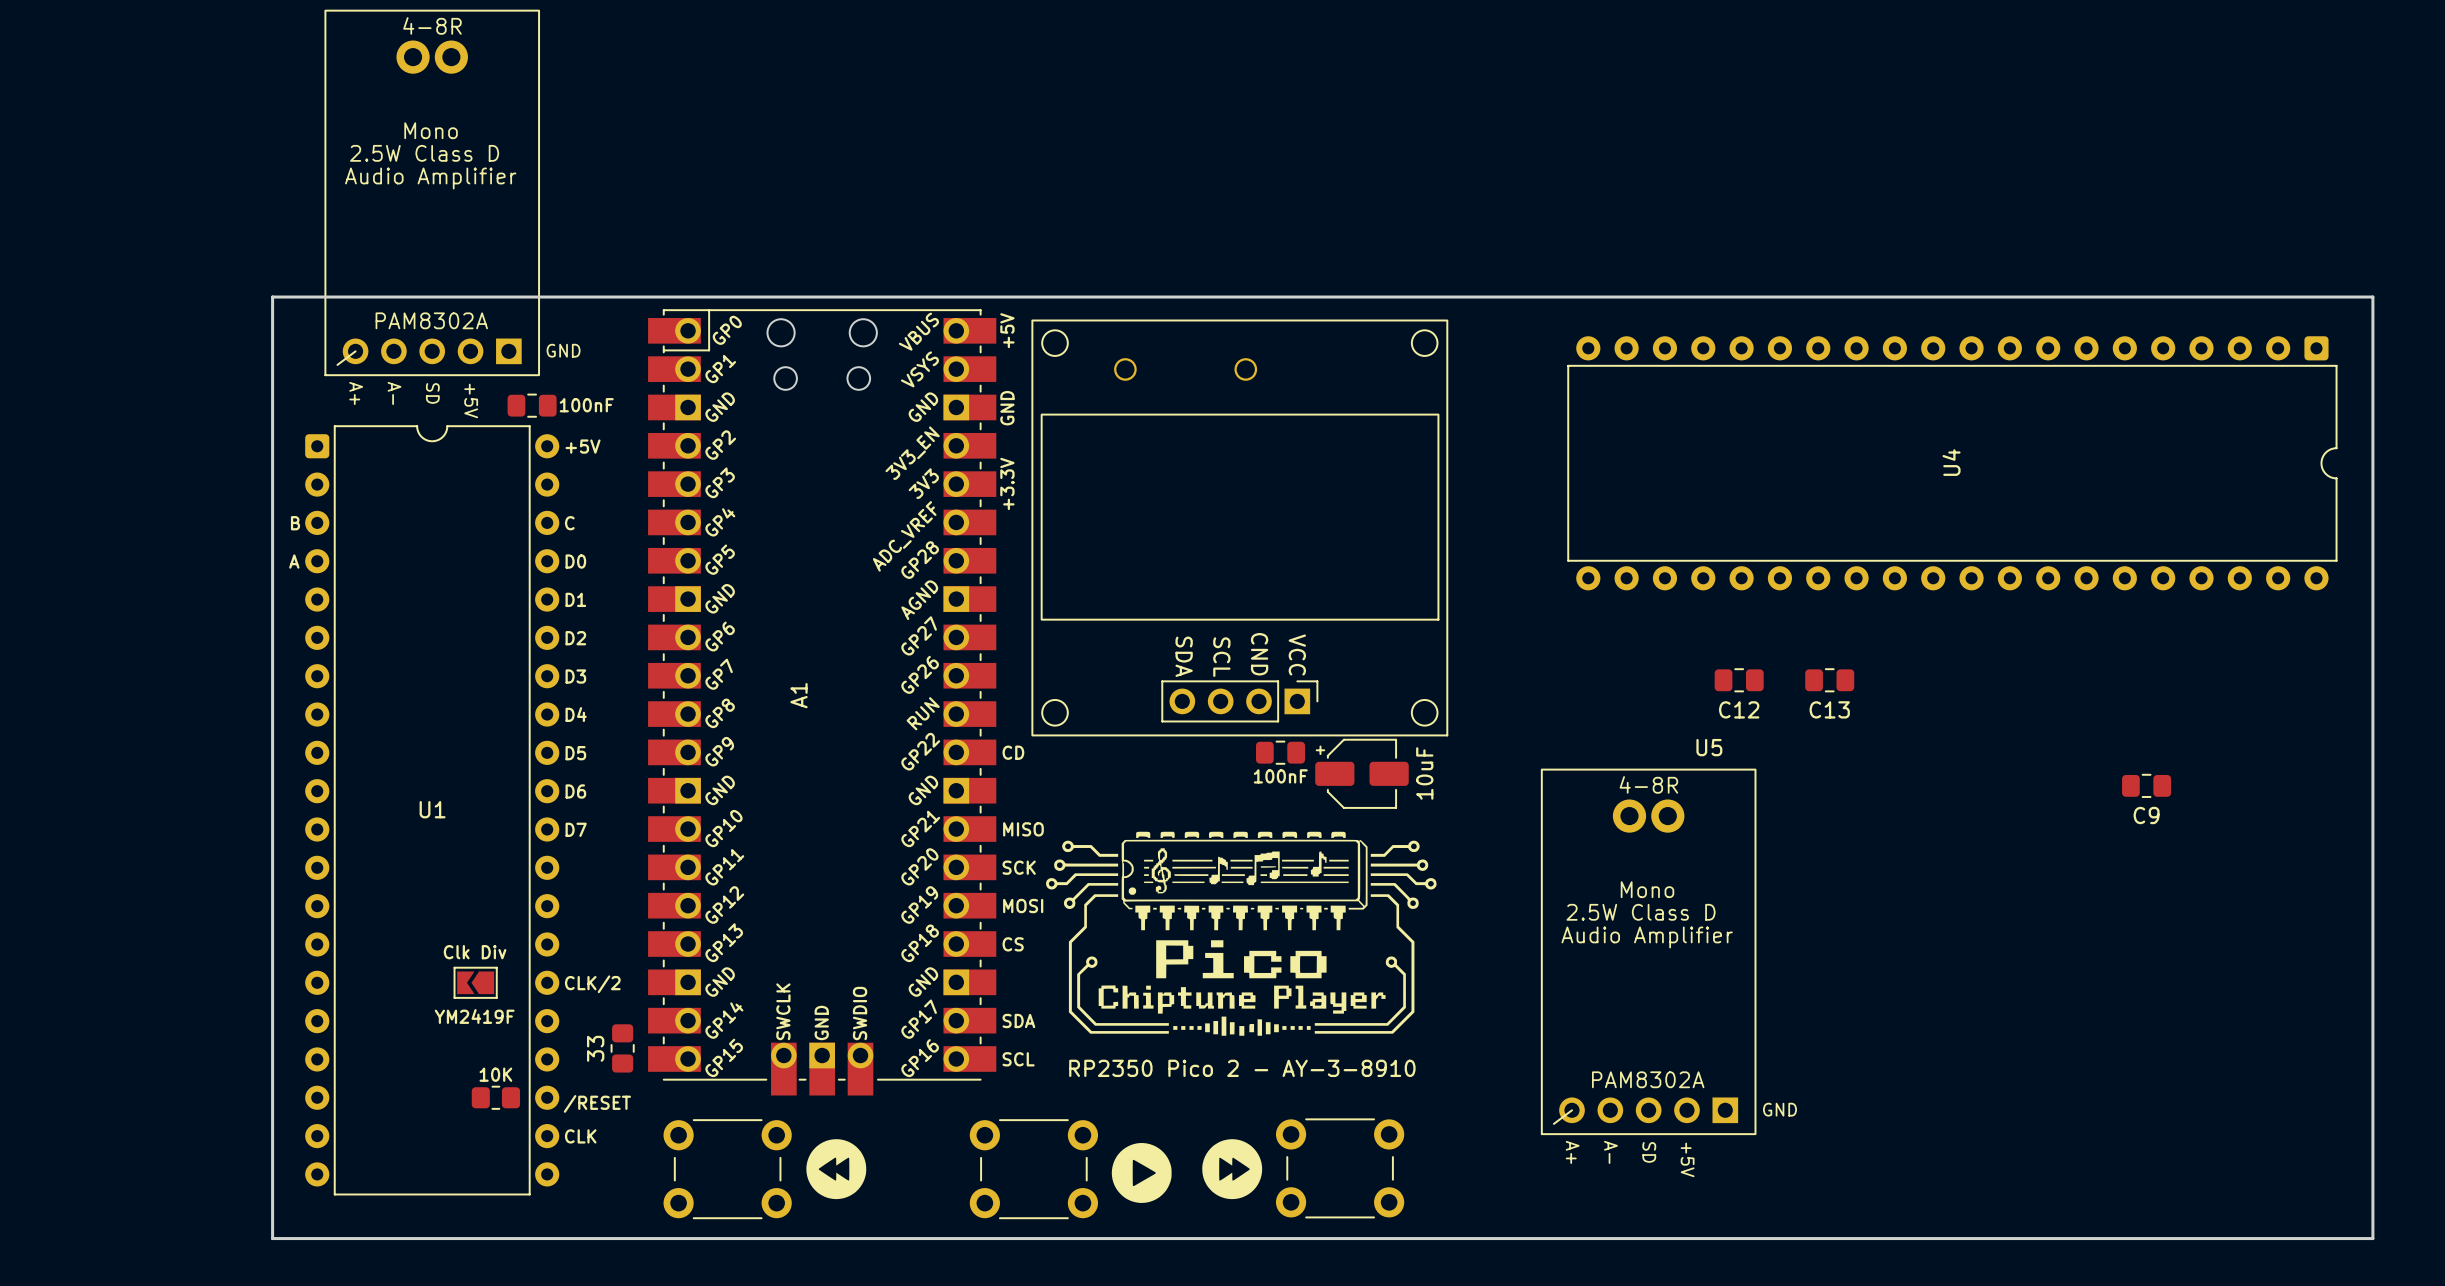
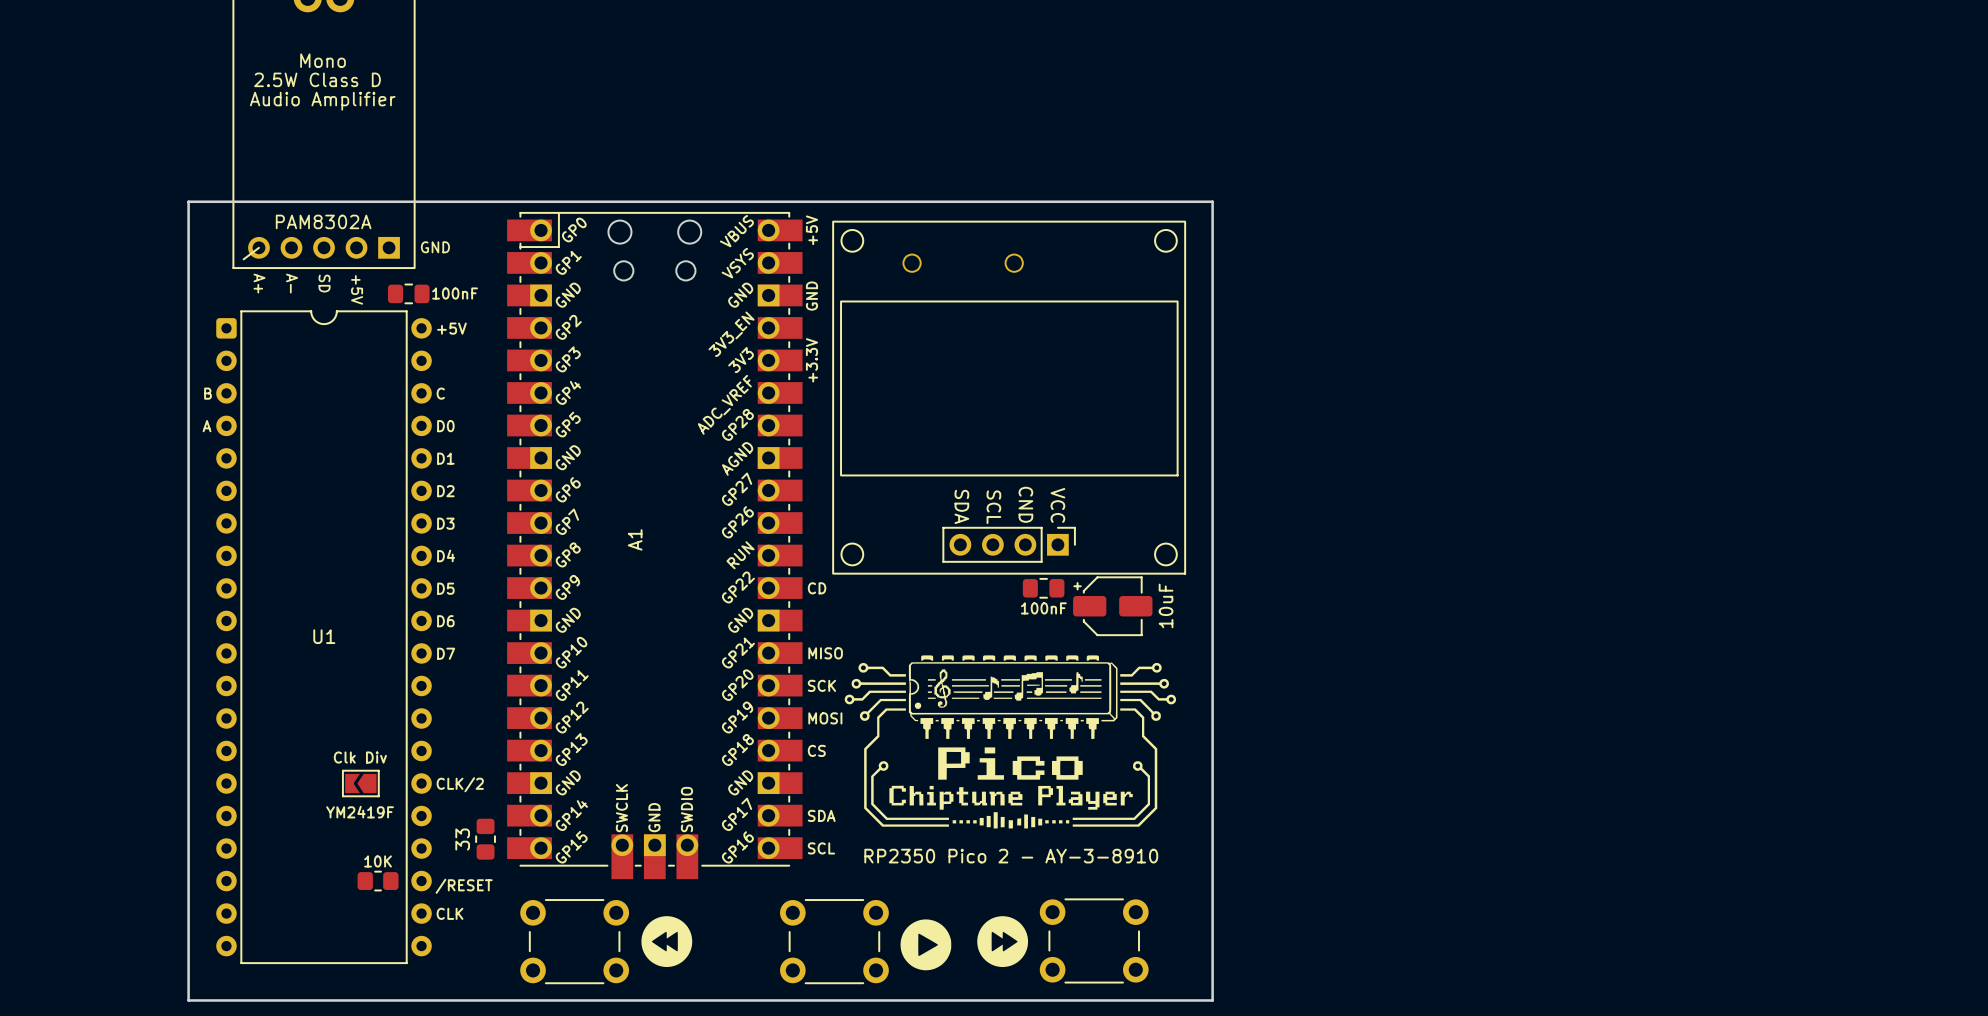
board edge: (1479, 297) (2372, 297) (2372, 1238) (1479, 1238) -> (1212, 201) (1212, 1000)
U4: (1952, 463) -> none
C12: (1739, 680) -> none
C13: (1829, 680) -> none
C9: (2146, 785) -> none
U5: (1648, 951) -> none

